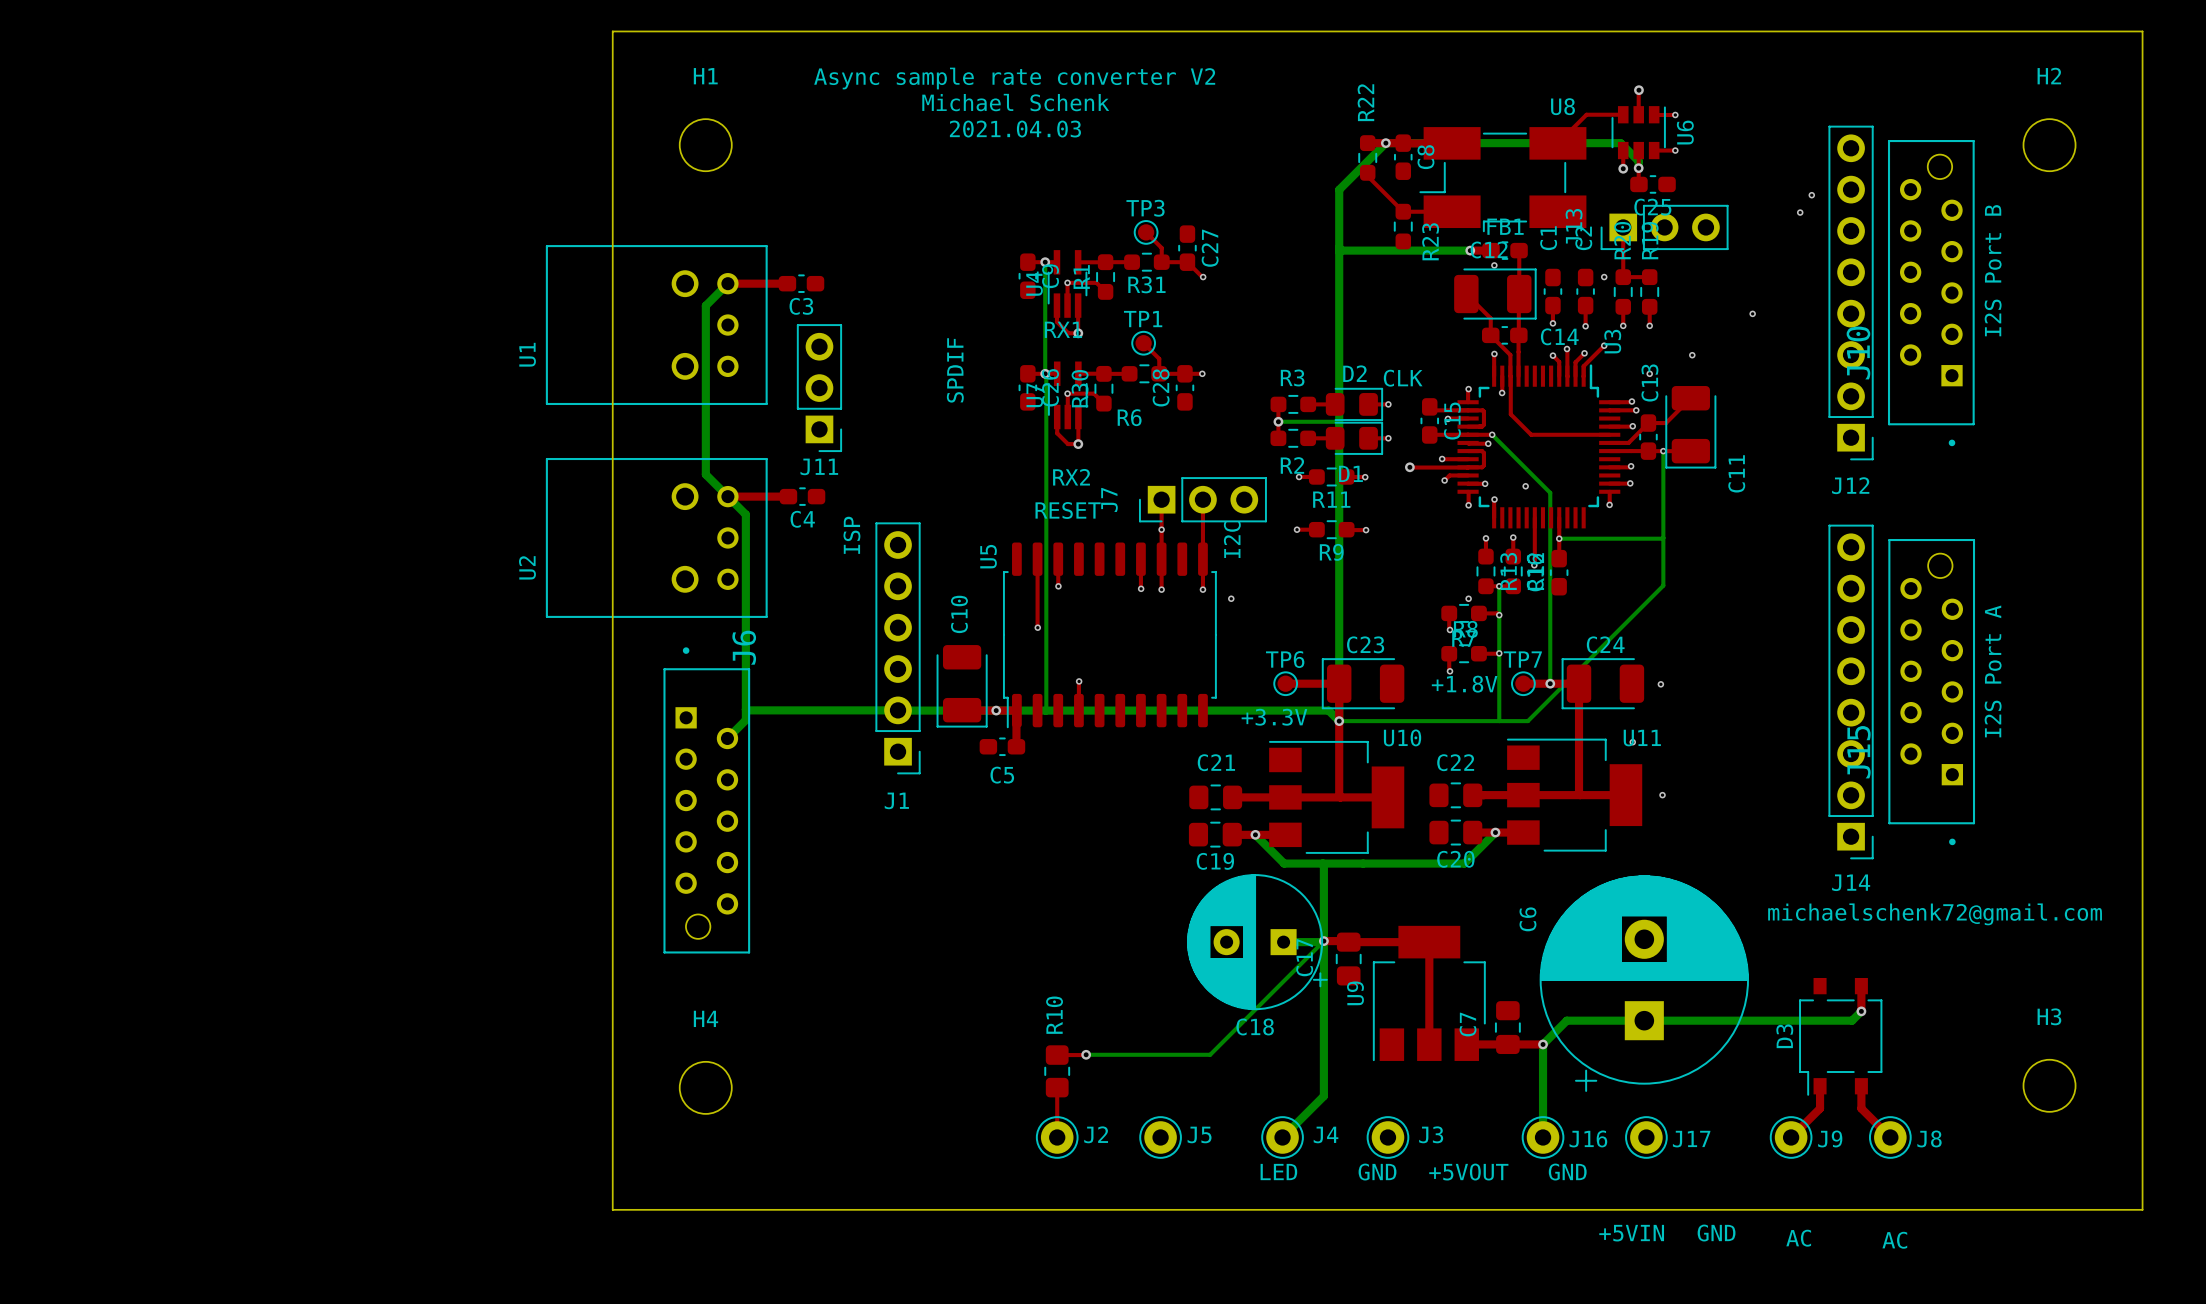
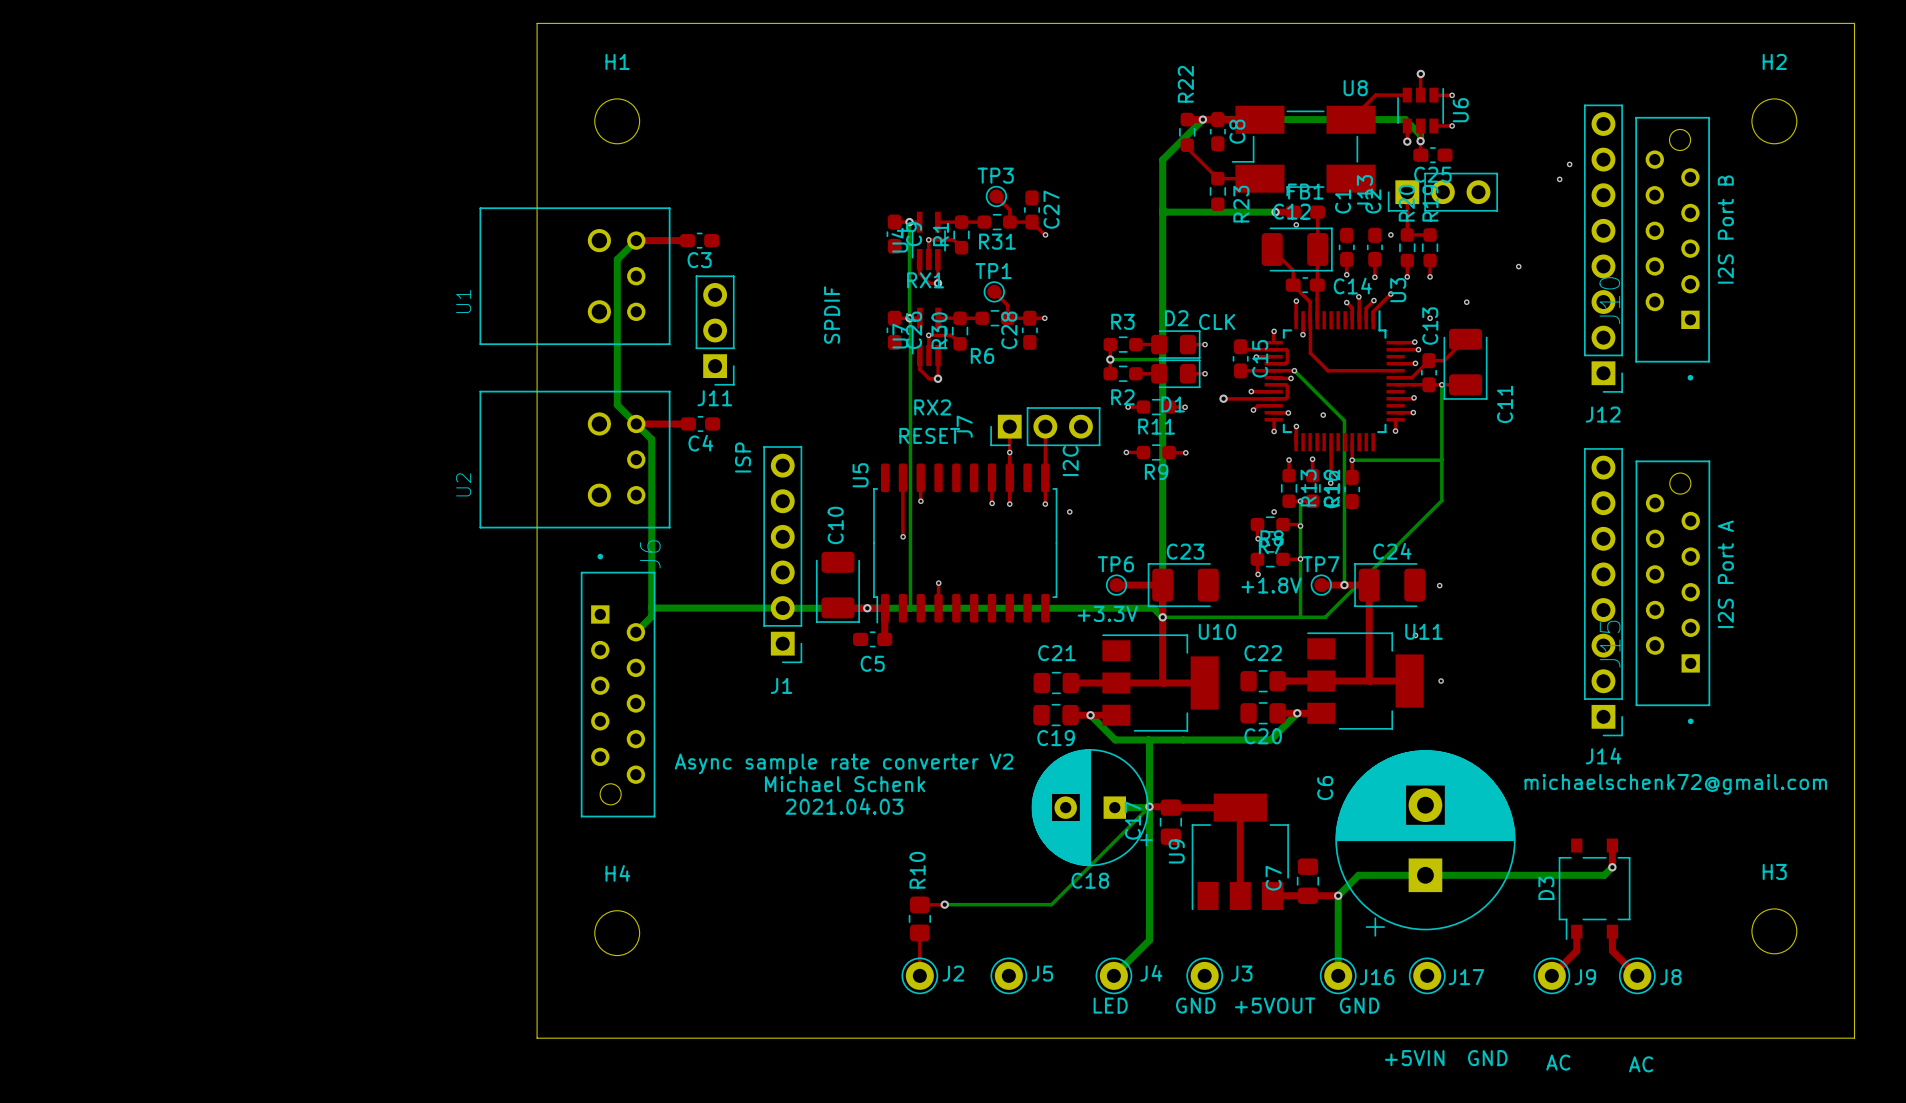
text: Async sample rate converter V2 (1014, 78) -> none
text: Michael Schenk (1015, 102) -> none
text: 2021.04.03 (1015, 129) -> none
text: none -> Async sample rate converter V2 (844, 763)
text: none -> Michael Schenk (845, 784)
text: none -> 2021.04.03 (844, 806)

